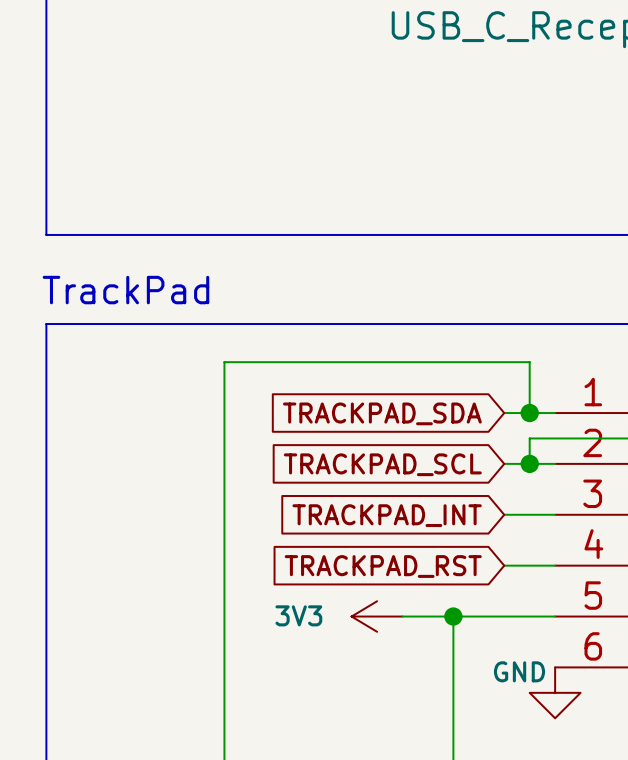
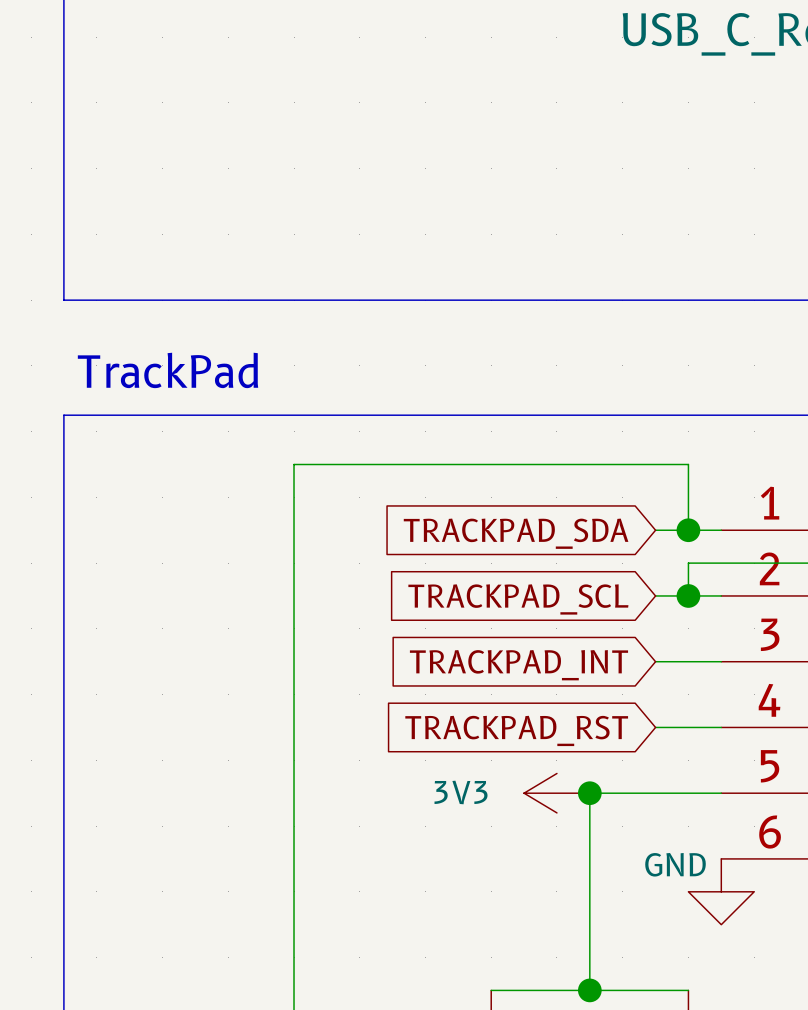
power symbol position: 3V3 (377, 616) -> 3V3 (556, 793)

